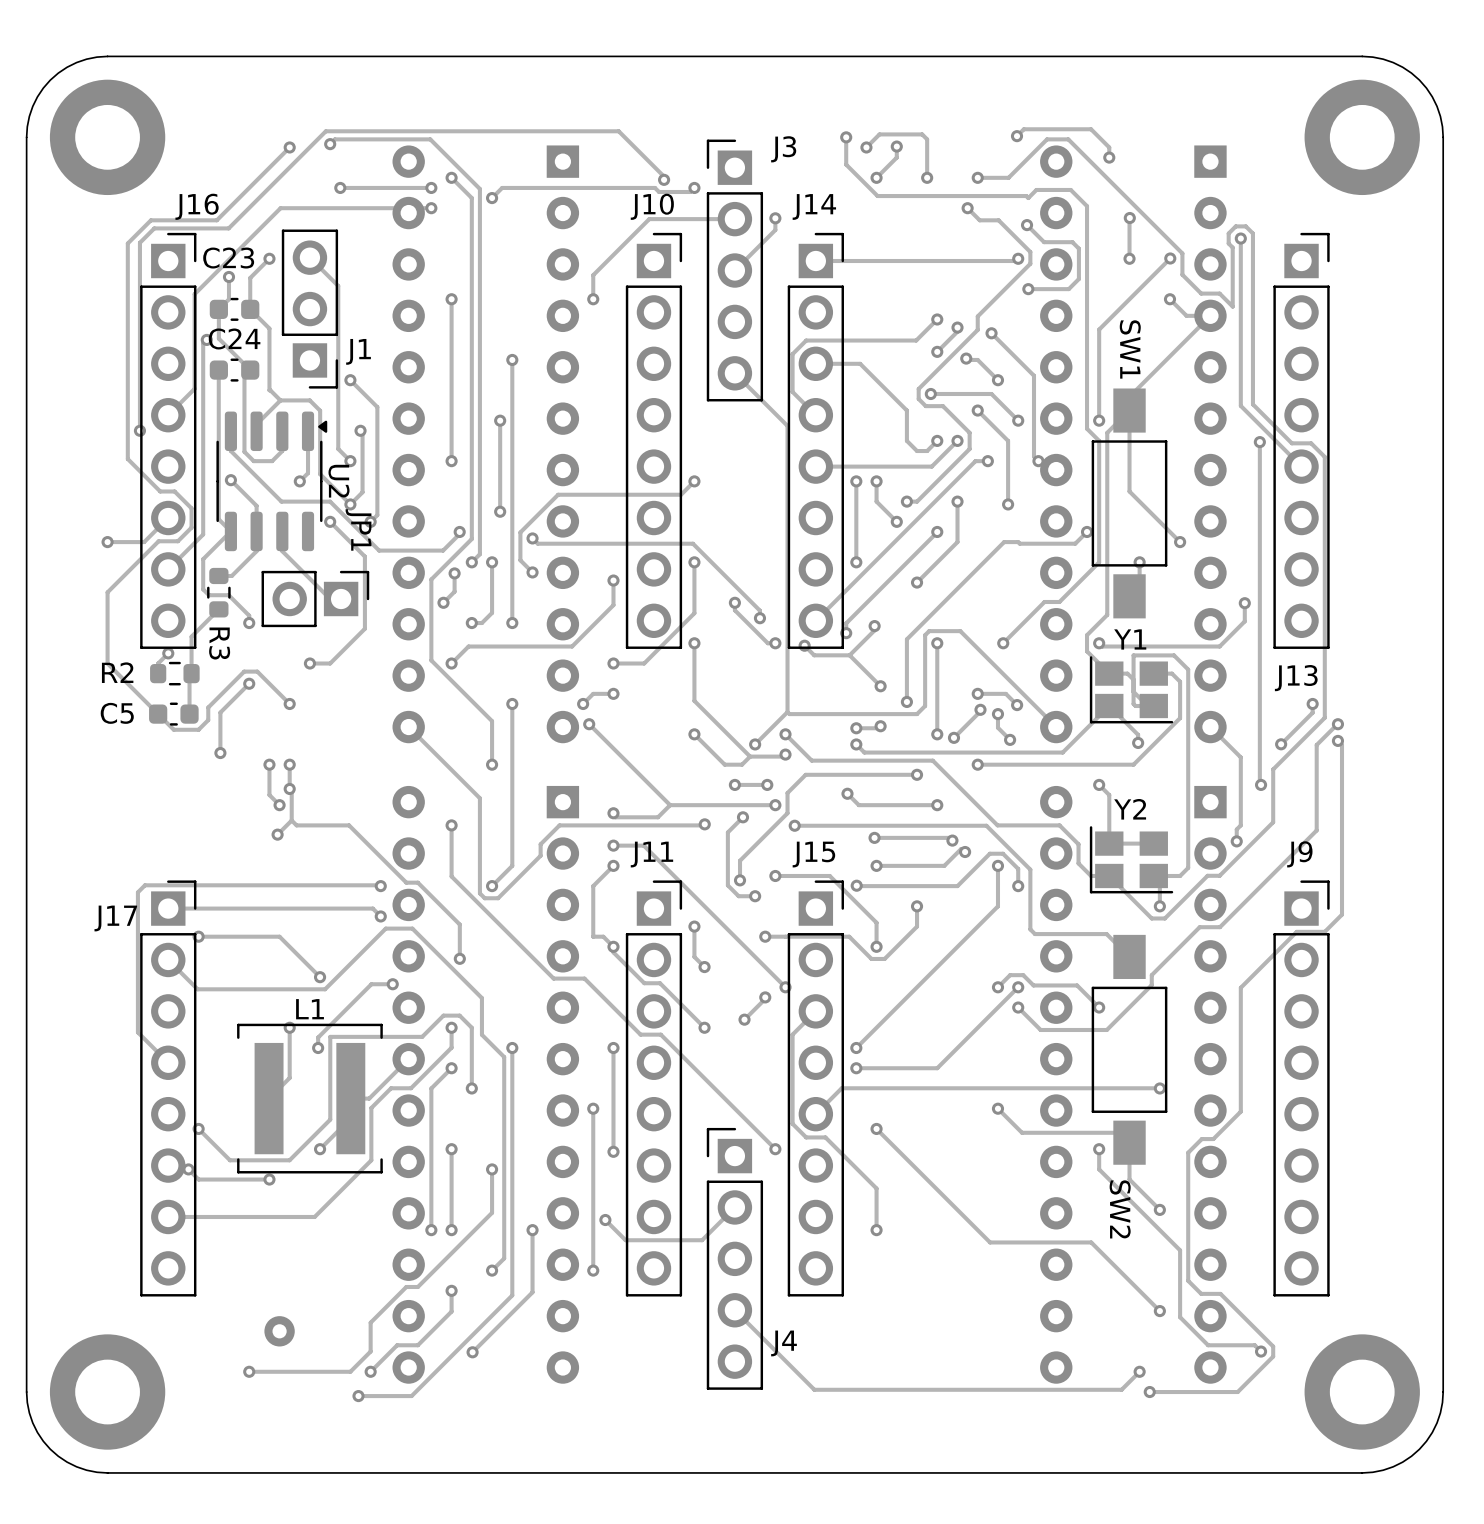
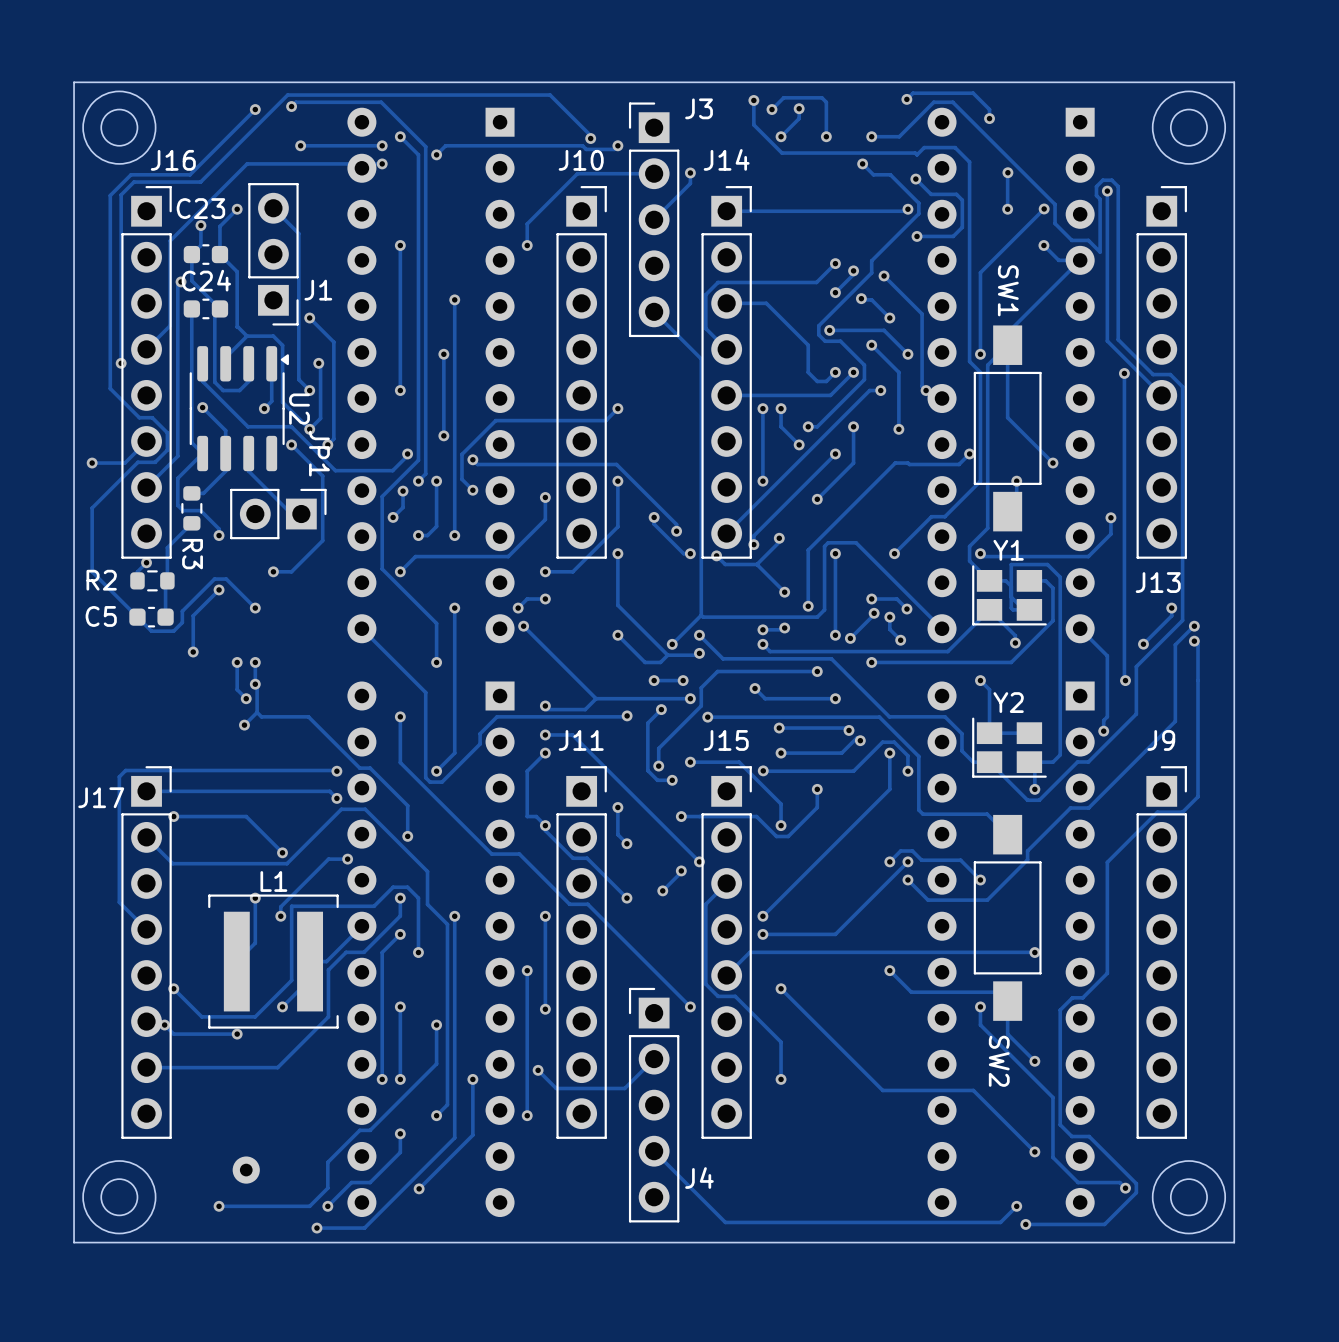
board edge: (1362, 56) (107, 56) (76, 62) (50, 80) (32, 106) (26, 137) (26, 1392) (32, 1423) (50, 1449) (76, 1466) (107, 1472) (1362, 1472) (1393, 1466) (1419, 1449) (1437, 1423) (1443, 1392) (1443, 137) (1437, 106) (1419, 80) (1393, 62) (1362, 56) -> (1234, 82) (1234, 1242) (74, 1242) (74, 82) (1234, 82)
round board edge: none -> [82, 90, 157, 165]
round board edge: none -> [1152, 90, 1226, 165]
part: (107, 137) -> none
part: (1362, 137) -> none
round board edge: none -> [100, 109, 138, 147]
round board edge: none -> [1170, 109, 1208, 147]
round board edge: none -> [82, 1160, 157, 1234]
round board edge: none -> [1152, 1160, 1226, 1234]
round board edge: none -> [100, 1178, 138, 1216]
round board edge: none -> [1170, 1178, 1208, 1216]
part: (107, 1392) -> none
part: (1362, 1392) -> none

